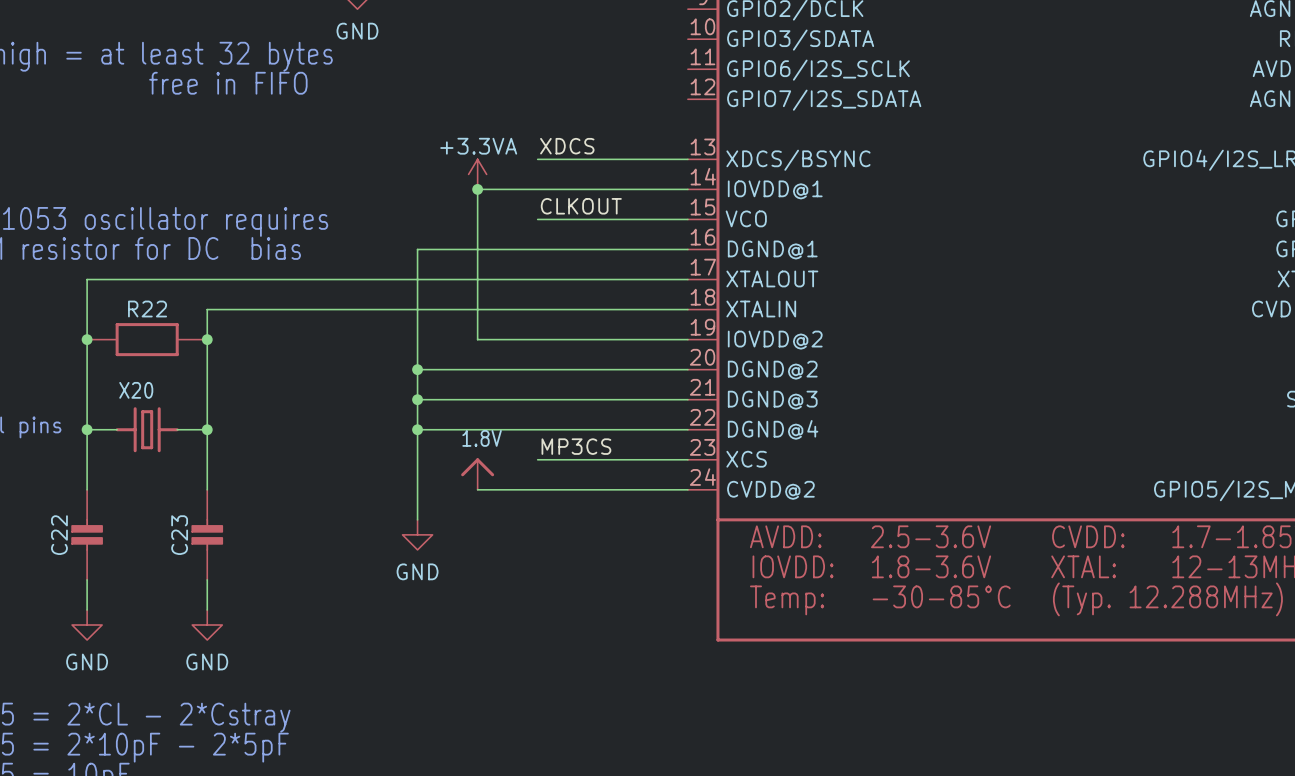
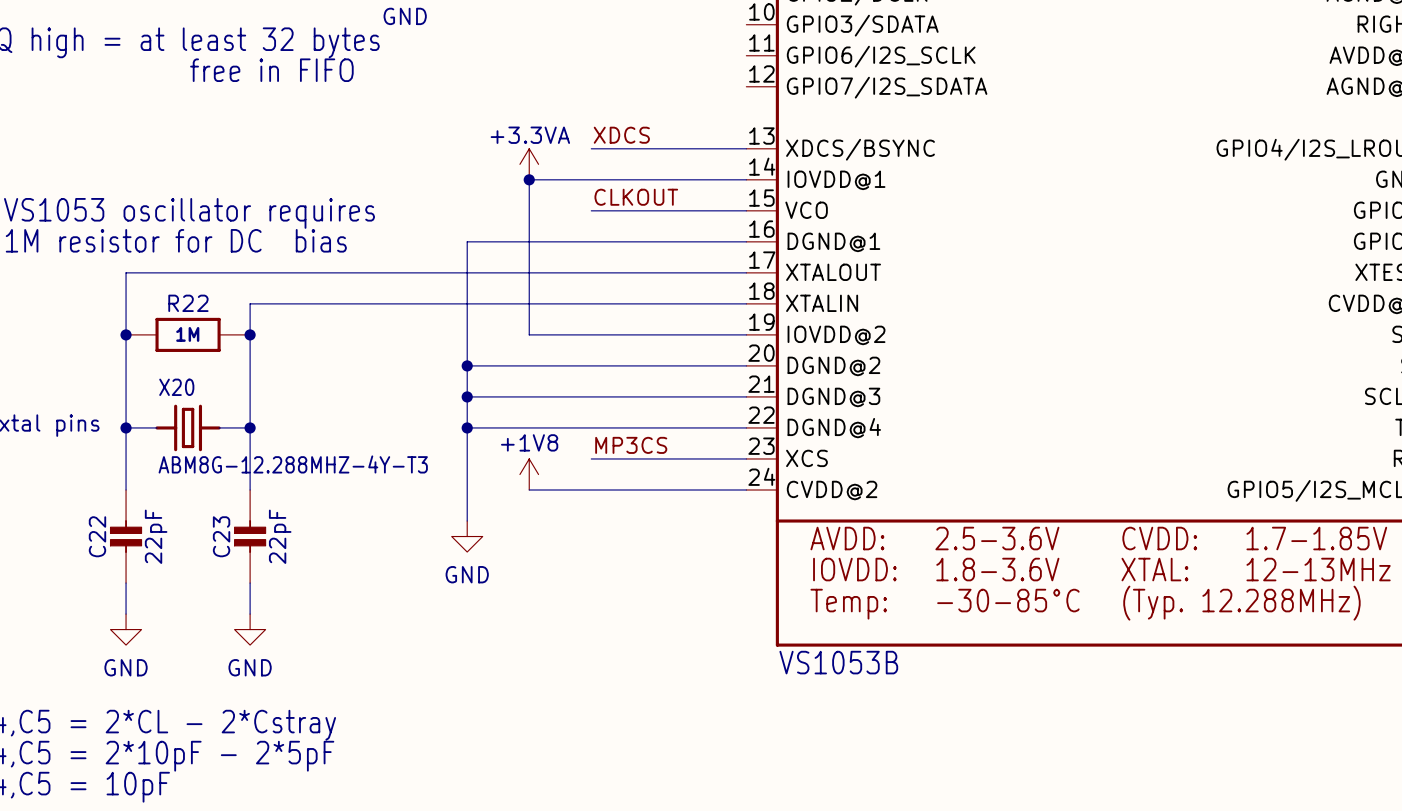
R22 value: none -> 1M (187, 334)
X20 value: none -> ABM8G-12.288MHZ-4Y-T3 (293, 464)
power symbol: 1.8V (477, 474) -> +1V8 (529, 474)
C22 value: none -> 22pF (156, 536)
C23 value: none -> 22pF (280, 536)
part value: none -> VS1053B (838, 662)

